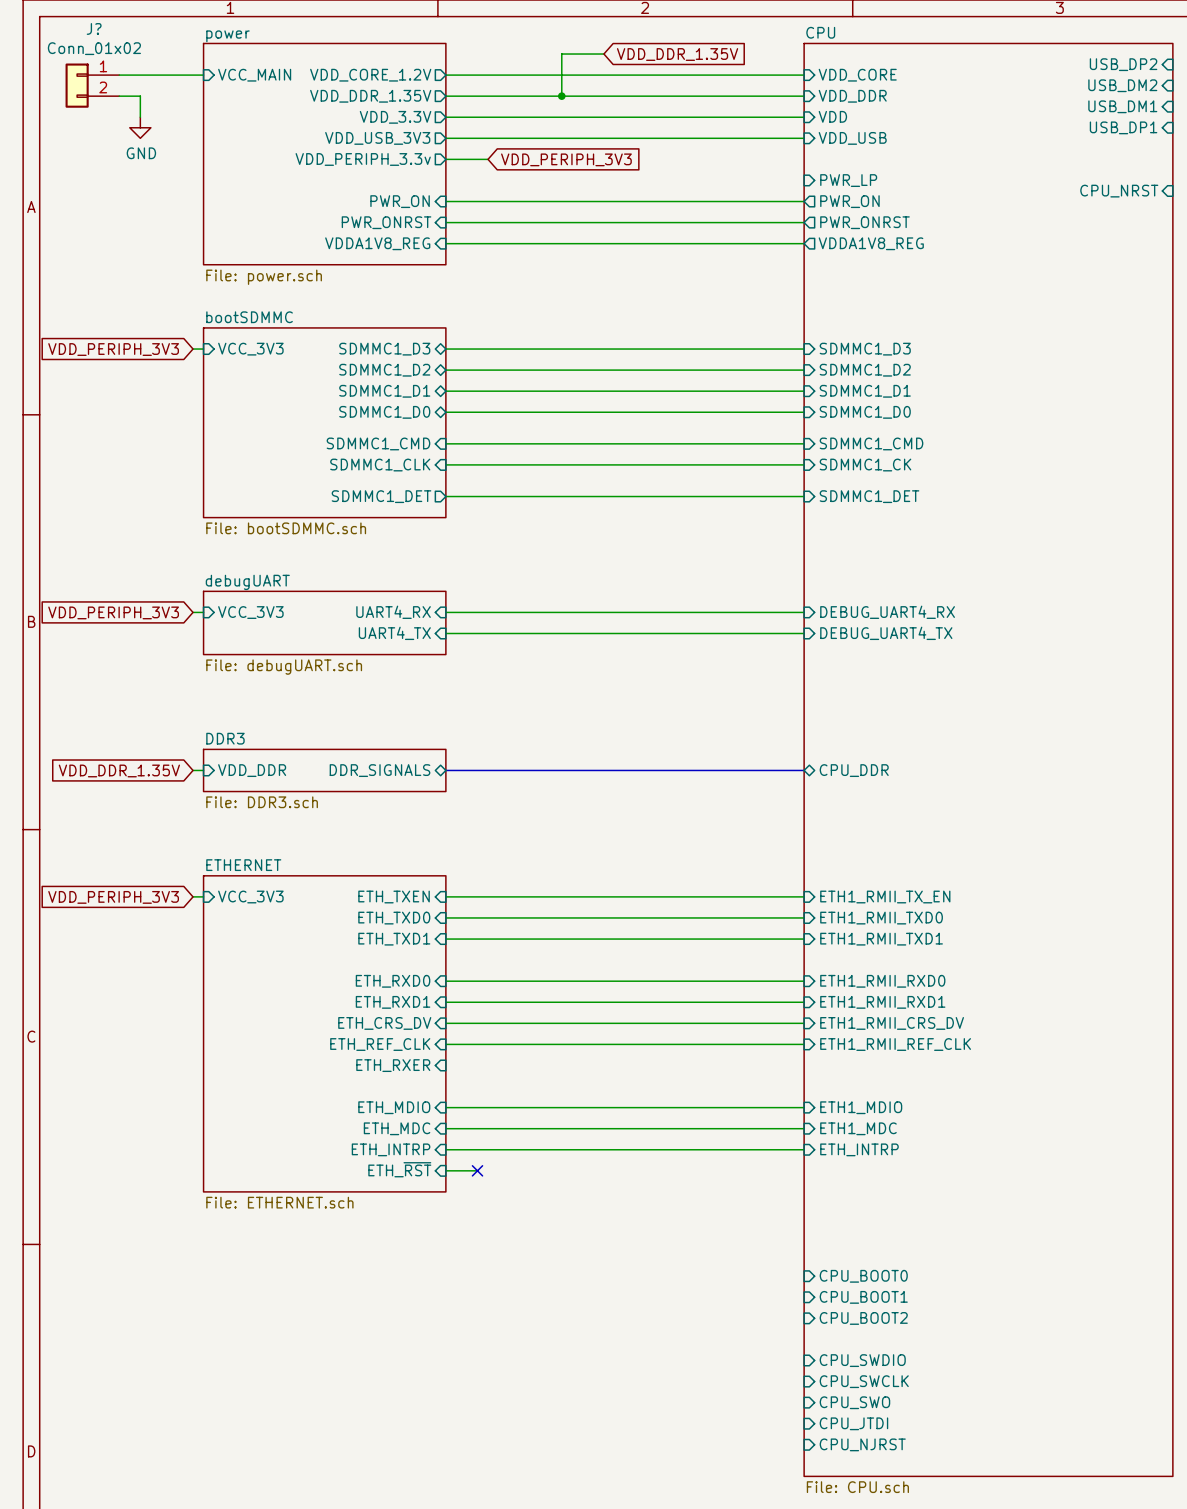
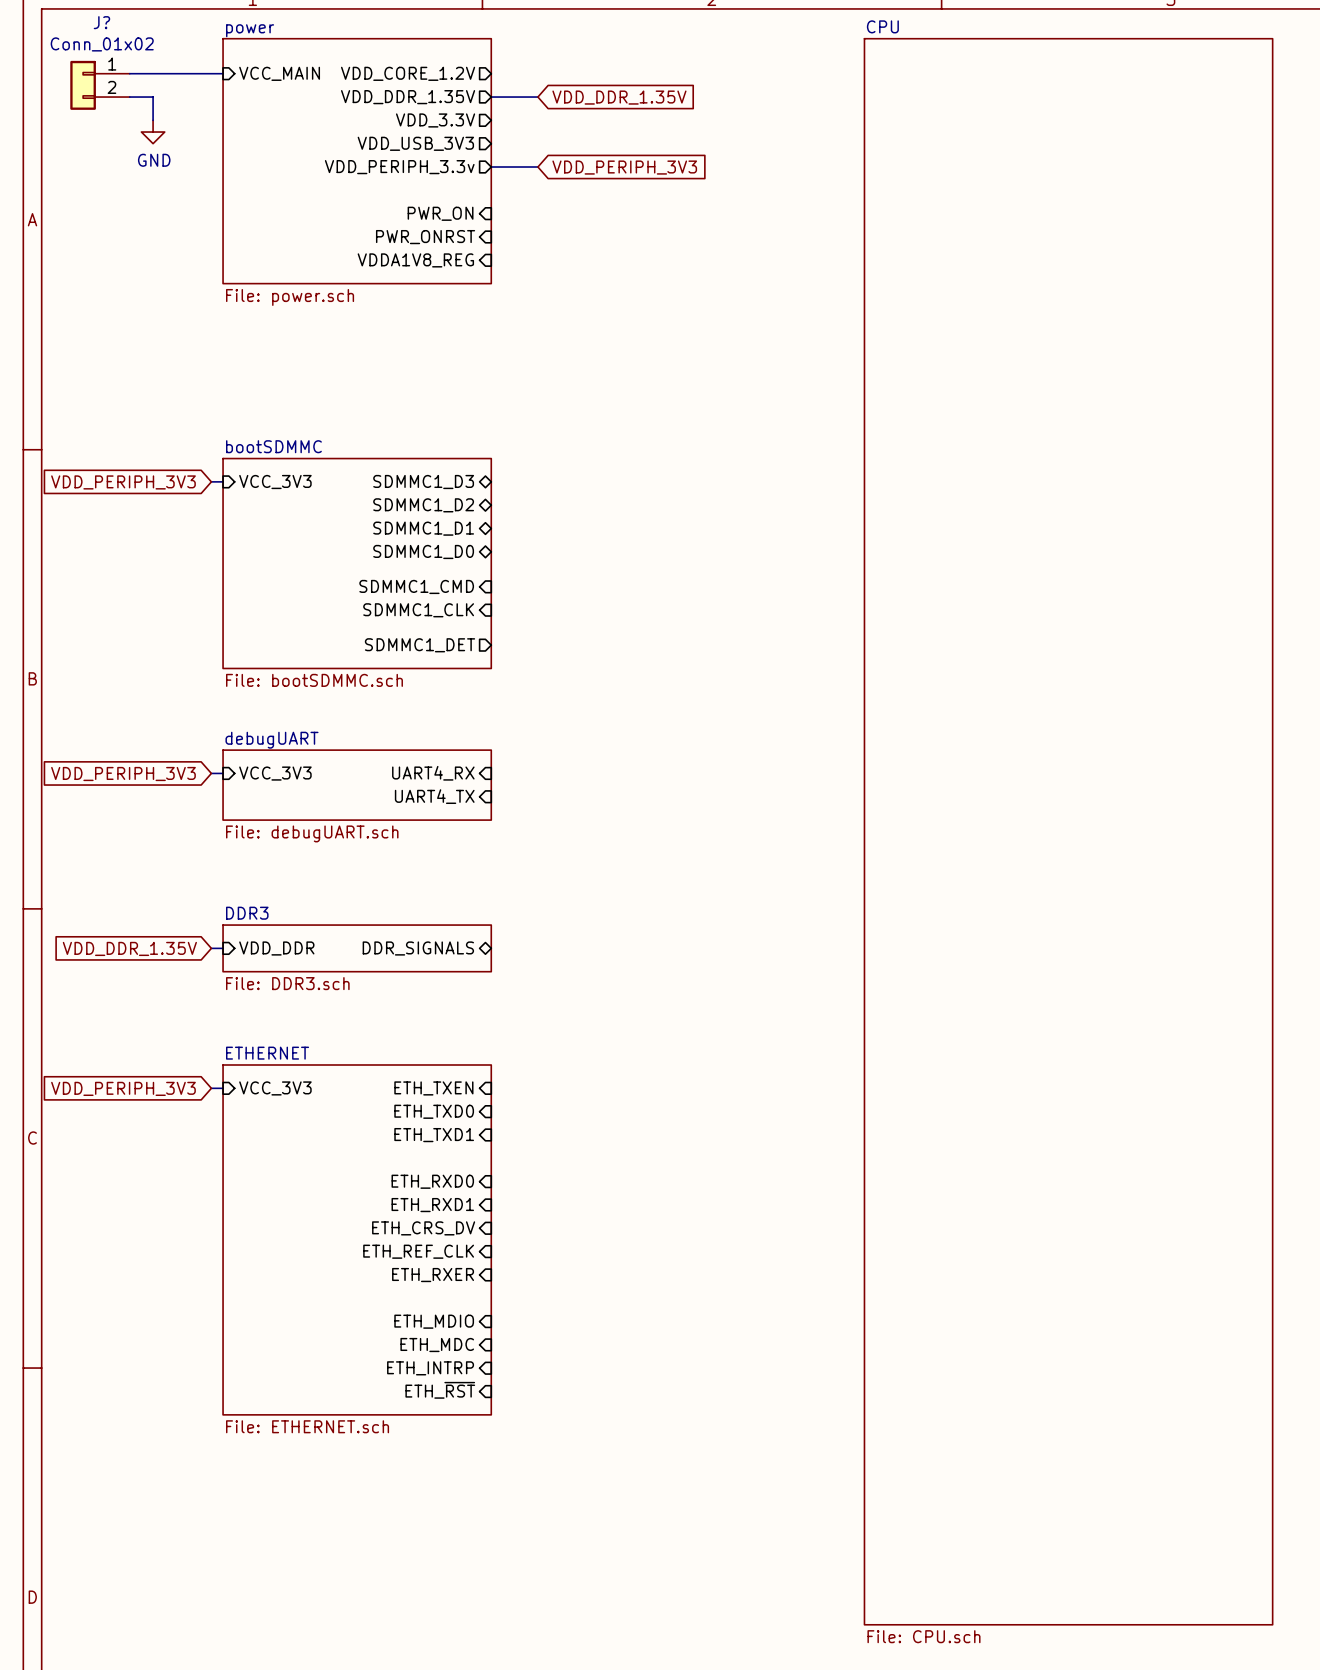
wire: (603, 54) (561, 54) (561, 96) -> none
global label position: VDD_DDR_1.35V (677, 54) -> VDD_DDR_1.35V (619, 97)
sheet pin: USB_DP2 (1123, 64) -> none
wire: (445, 75) (804, 75) -> none
sheet pin: VDD_CORE (857, 75) -> none
sheet pin: USB_DM2 (1122, 85) -> none
wire: (488, 96) (804, 96) -> none
junction: (561, 96) -> none
sheet pin: VDD_DDR (852, 96) -> none
sheet pin: USB_DM1 (1122, 106) -> none
sheet pin: VDD (832, 116) -> none
wire: (445, 117) (804, 117) -> none
sheet pin: USB_DP1 (1123, 127) -> none
wire: (445, 138) (804, 138) -> none
sheet pin: VDD_USB (852, 138) -> none
sheet pin: PWR_LP (848, 180) -> none
sheet pin: CPU_NRST (1119, 191) -> none
wire: (445, 201) (804, 201) -> none
sheet pin: PWR_ON (849, 201) -> none
wire: (445, 222) (804, 222) -> none
sheet pin: PWR_ONRST (864, 222) -> none
wire: (445, 243) (804, 243) -> none
sheet pin: VDDA1V8_REG (871, 243) -> none
global label: VDD_PERIPH_3V3 (113, 349) -> none
wire: (193, 349) (203, 349) -> (211, 481) (223, 481)
sheet pin: VCC_3V3 (250, 349) -> none
sheet pin: SDMMC1_D3 (384, 349) -> none
wire: (445, 349) (804, 349) -> none
sheet pin: SDMMC1_D3 (865, 349) -> none
sheet pin: SDMMC1_D2 (384, 370) -> none
wire: (445, 370) (804, 370) -> none
sheet pin: SDMMC1_D2 (865, 370) -> none
sheet pin position: SDMMC1_D1 (384, 391) -> SDMMC1_D1 (423, 528)
wire: (445, 391) (804, 391) -> none
sheet pin: SDMMC1_D1 (865, 391) -> none
sheet pin position: SDMMC1_D0 (384, 412) -> SDMMC1_D0 (423, 551)
wire: (445, 412) (804, 412) -> none
sheet pin: SDMMC1_D0 (865, 412) -> none
sheet bootSDMMC position: (324, 422) -> (357, 563)
sheet pin: none -> VCC_3V3 (275, 482)
sheet pin shape: input (378, 443) -> bidirectional (423, 482)
sheet pin: SDMMC1_CMD (378, 443) -> SDMMC1_D3 (423, 482)
wire: (445, 443) (804, 443) -> none
sheet pin: SDMMC1_CMD (871, 443) -> none
global label: none -> VDD_PERIPH_3V3 (123, 482)
wire: (445, 464) (804, 464) -> none
sheet pin shape: input (380, 465) -> bidirectional (423, 505)
sheet pin: SDMMC1_CLK (380, 465) -> SDMMC1_D2 (423, 505)
sheet pin: SDMMC1_CK (865, 465) -> none
sheet pin position: SDMMC1_DET (381, 496) -> SDMMC1_DET (420, 645)
wire: (445, 496) (804, 496) -> none
sheet pin: SDMMC1_DET (869, 496) -> none
sheet pin: none -> SDMMC1_CMD (416, 586)
sheet pin: none -> SDMMC1_CLK (418, 610)
global label: VDD_PERIPH_3V3 (113, 612) -> none
wire: (193, 612) (203, 612) -> (211, 773) (223, 773)
sheet pin: VCC_3V3 (250, 612) -> none
sheet pin position: UART4_RX (393, 612) -> UART4_RX (433, 773)
wire: (445, 612) (804, 612) -> none
sheet pin: DEBUG_UART4_RX (887, 612) -> none
sheet debugUART position: (324, 622) -> (357, 785)
sheet pin position: UART4_TX (394, 633) -> UART4_TX (434, 796)
wire: (445, 633) (804, 633) -> none
sheet pin: DEBUG_UART4_TX (886, 633) -> none
global label: none -> VDD_PERIPH_3V3 (123, 773)
sheet pin: none -> VCC_3V3 (275, 773)
sheet CPU position: (988, 759) -> (1068, 831)
global label position: VDD_DDR_1.35V (119, 770) -> VDD_DDR_1.35V (129, 948)
wire: (193, 770) (203, 770) -> (211, 948) (223, 948)
sheet pin position: VDD_DDR (252, 770) -> VDD_DDR (276, 948)
sheet DDR3 position: (324, 770) -> (357, 948)
sheet pin position: DDR_SIGNALS (380, 770) -> DDR_SIGNALS (418, 948)
bus: (445, 770) (804, 770) -> none
sheet pin: CPU_DDR (854, 770) -> none
wire: (193, 896) (203, 896) -> (211, 1088) (223, 1088)
wire: (445, 896) (804, 896) -> none
global label: VDD_PERIPH_3V3 (113, 897) -> none
sheet pin: VCC_3V3 (250, 897) -> none
sheet pin position: ETH_TXEN (394, 897) -> ETH_TXEN (433, 1088)
sheet pin: ETH1_RMII_TX_EN (885, 897) -> none
wire: (445, 917) (804, 917) -> none
sheet pin position: ETH_TXD0 (394, 918) -> ETH_TXD0 (434, 1111)
sheet pin: ETH1_RMII_TXD0 (881, 918) -> none
sheet pin position: ETH_TXD1 (394, 939) -> ETH_TXD1 (434, 1135)
wire: (445, 939) (804, 939) -> none
sheet pin: ETH1_RMII_TXD1 (881, 939) -> none
sheet pin position: ETH_RXD0 (393, 981) -> ETH_RXD0 (432, 1181)
wire: (445, 981) (804, 981) -> none
sheet pin: ETH1_RMII_RXD0 (882, 981) -> none
sheet pin: none -> VCC_3V3 (275, 1088)
global label: none -> VDD_PERIPH_3V3 (123, 1088)
sheet pin position: ETH_RXD1 (393, 1002) -> ETH_RXD1 (432, 1205)
wire: (445, 1002) (804, 1002) -> none
sheet pin: ETH1_RMII_RXD1 (882, 1002) -> none
sheet pin position: ETH_CRS_DV (384, 1023) -> ETH_CRS_DV (423, 1228)
wire: (445, 1023) (804, 1023) -> none
sheet pin: ETH1_RMII_CRS_DV (892, 1023) -> none
sheet ETHERNET position: (324, 1033) -> (357, 1239)
sheet pin position: ETH_REF_CLK (380, 1044) -> ETH_REF_CLK (418, 1251)
wire: (445, 1044) (804, 1044) -> none
sheet pin: ETH1_RMII_REF_CLK (895, 1044) -> none
sheet pin position: ETH_RXER (393, 1065) -> ETH_RXER (433, 1275)
sheet pin position: ETH_MDIO (394, 1107) -> ETH_MDIO (434, 1321)
wire: (445, 1107) (804, 1107) -> none
sheet pin: ETH1_MDIO (861, 1107) -> none
sheet pin position: ETH_MDC (397, 1128) -> ETH_MDC (437, 1345)
wire: (445, 1128) (804, 1128) -> none
sheet pin: ETH1_MDC (858, 1128) -> none
sheet pin position: ETH_INTRP (391, 1149) -> ETH_INTRP (430, 1368)
wire: (445, 1149) (804, 1149) -> none
sheet pin: ETH_INTRP (859, 1149) -> none
sheet pin position: ETH_~{RST} (399, 1169) -> ETH_~{RST} (440, 1390)
wire: (445, 1170) (477, 1170) -> none
no-connect mark: (477, 1170) -> none
sheet pin: CPU_BOOT0 (863, 1276) -> none
sheet pin: CPU_BOOT1 (863, 1297) -> none
sheet pin: CPU_BOOT2 (863, 1318) -> none
sheet pin: CPU_SWDIO (862, 1360) -> none
sheet pin: CPU_SWCLK (864, 1381) -> none
sheet pin: CPU_SWO (854, 1402) -> none
sheet pin: CPU_JTDI (853, 1423) -> none
sheet pin: CPU_NJRST (862, 1444) -> none

